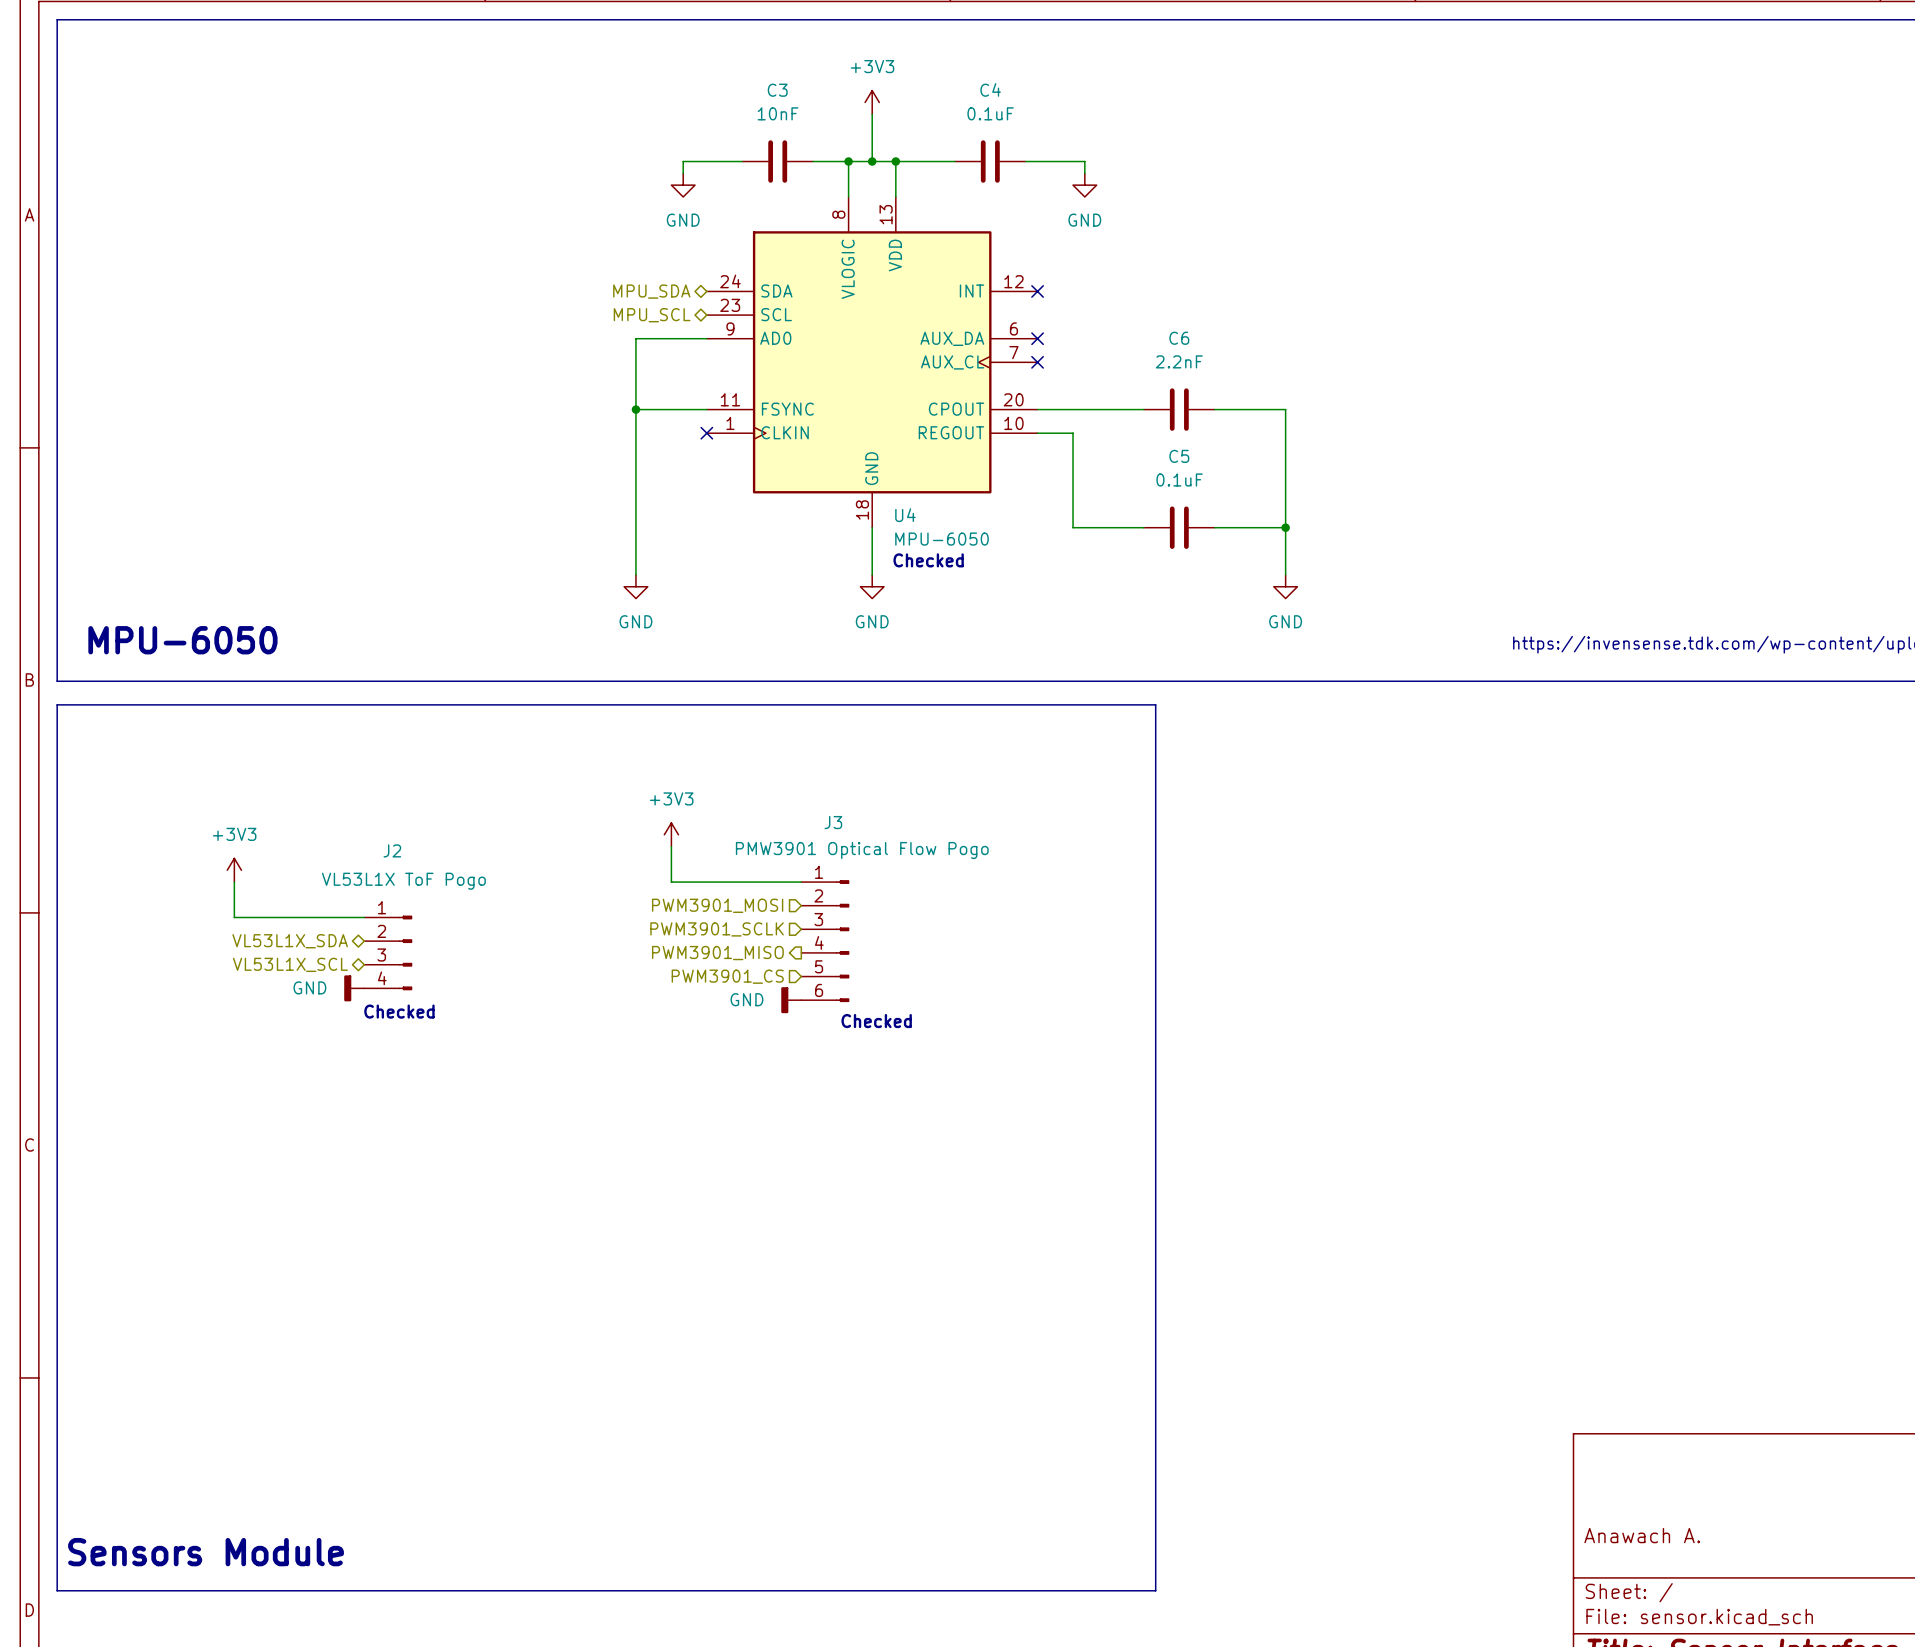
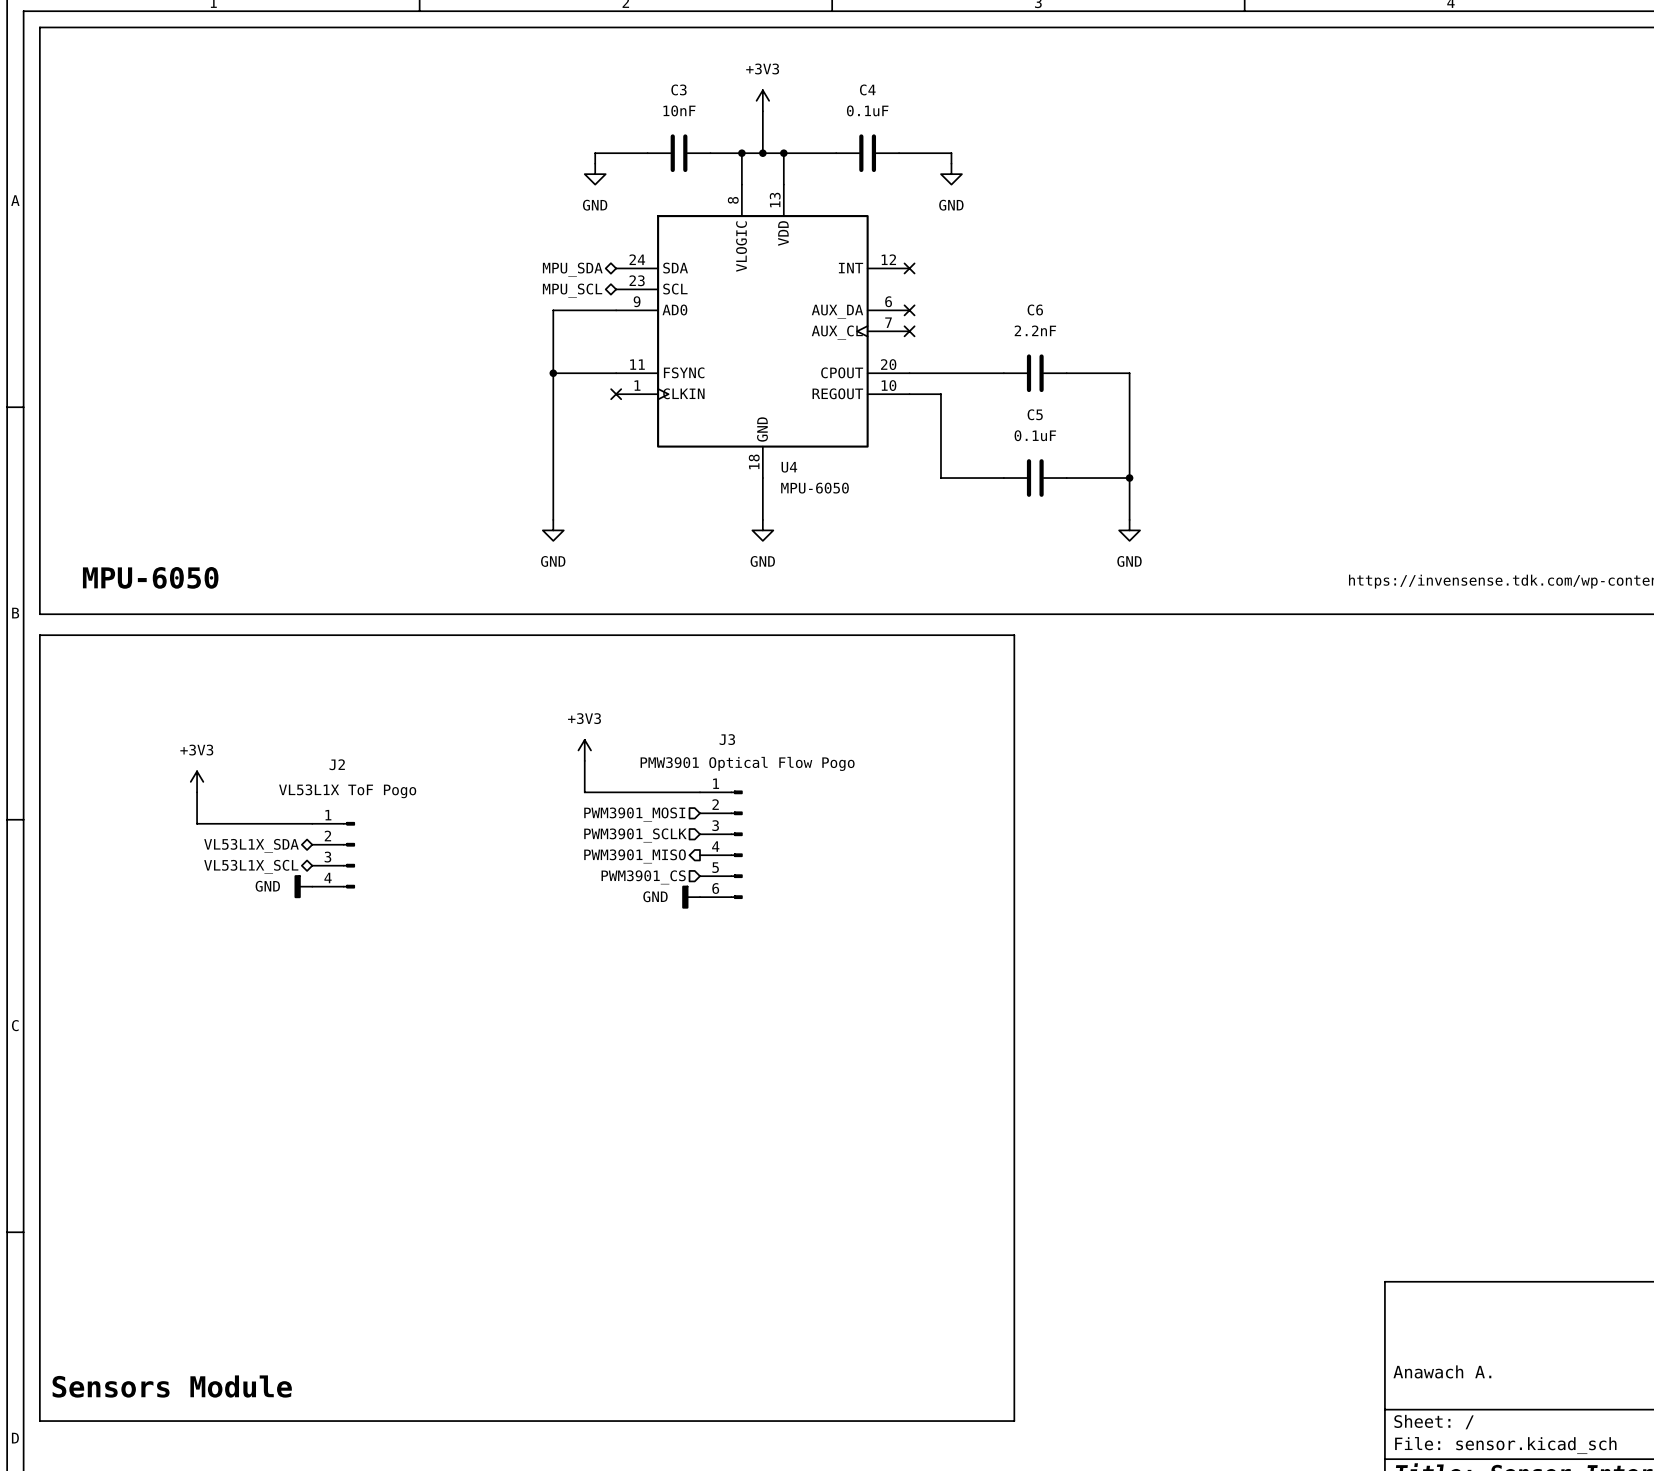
text: Checked (928, 560) -> none
text: Checked (399, 1011) -> none
text: Checked (876, 1021) -> none

